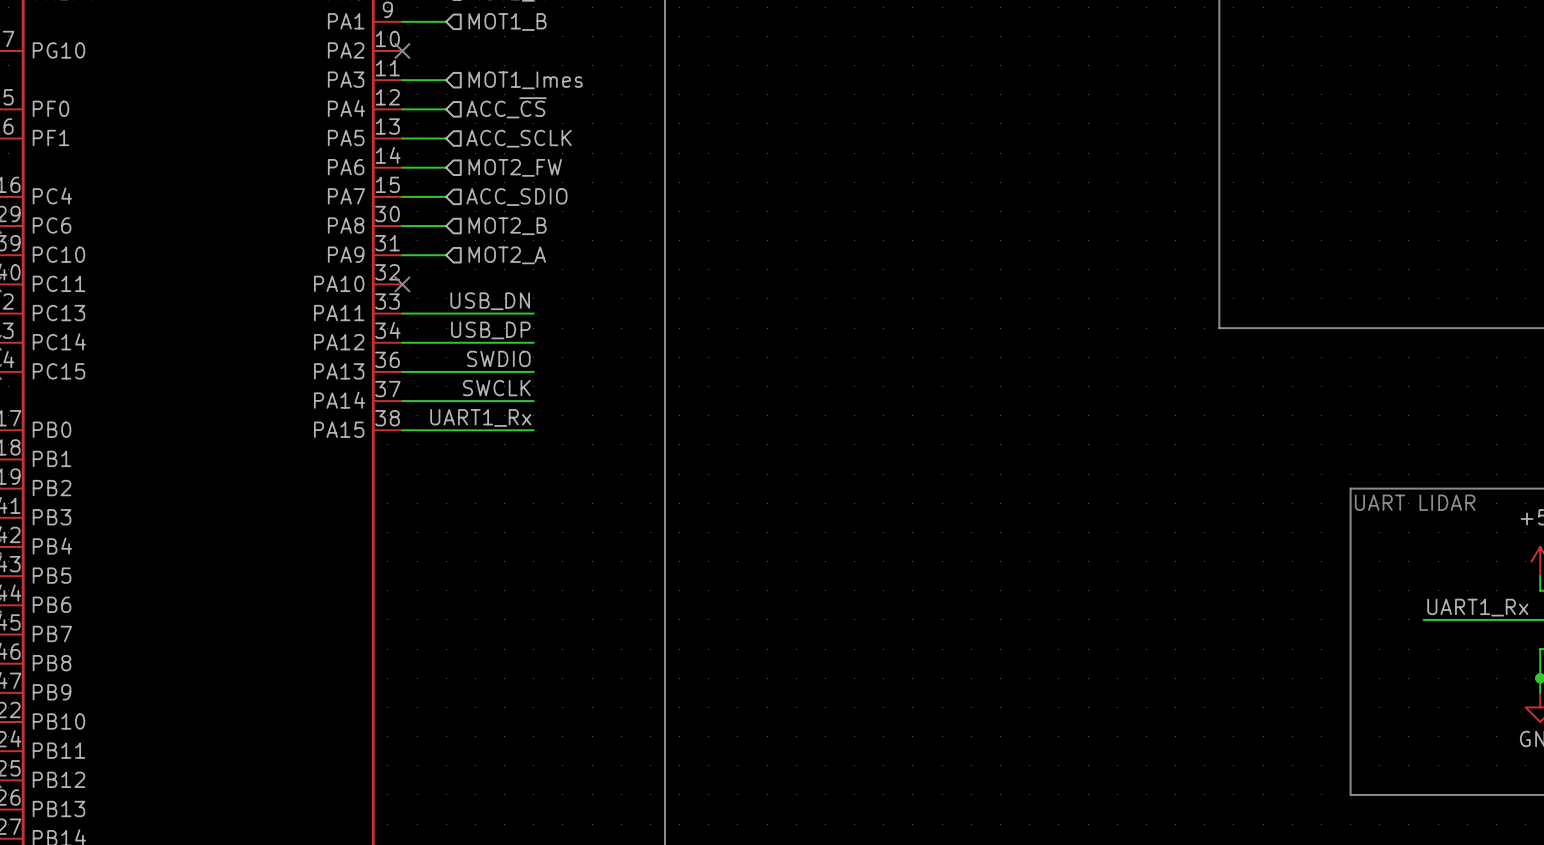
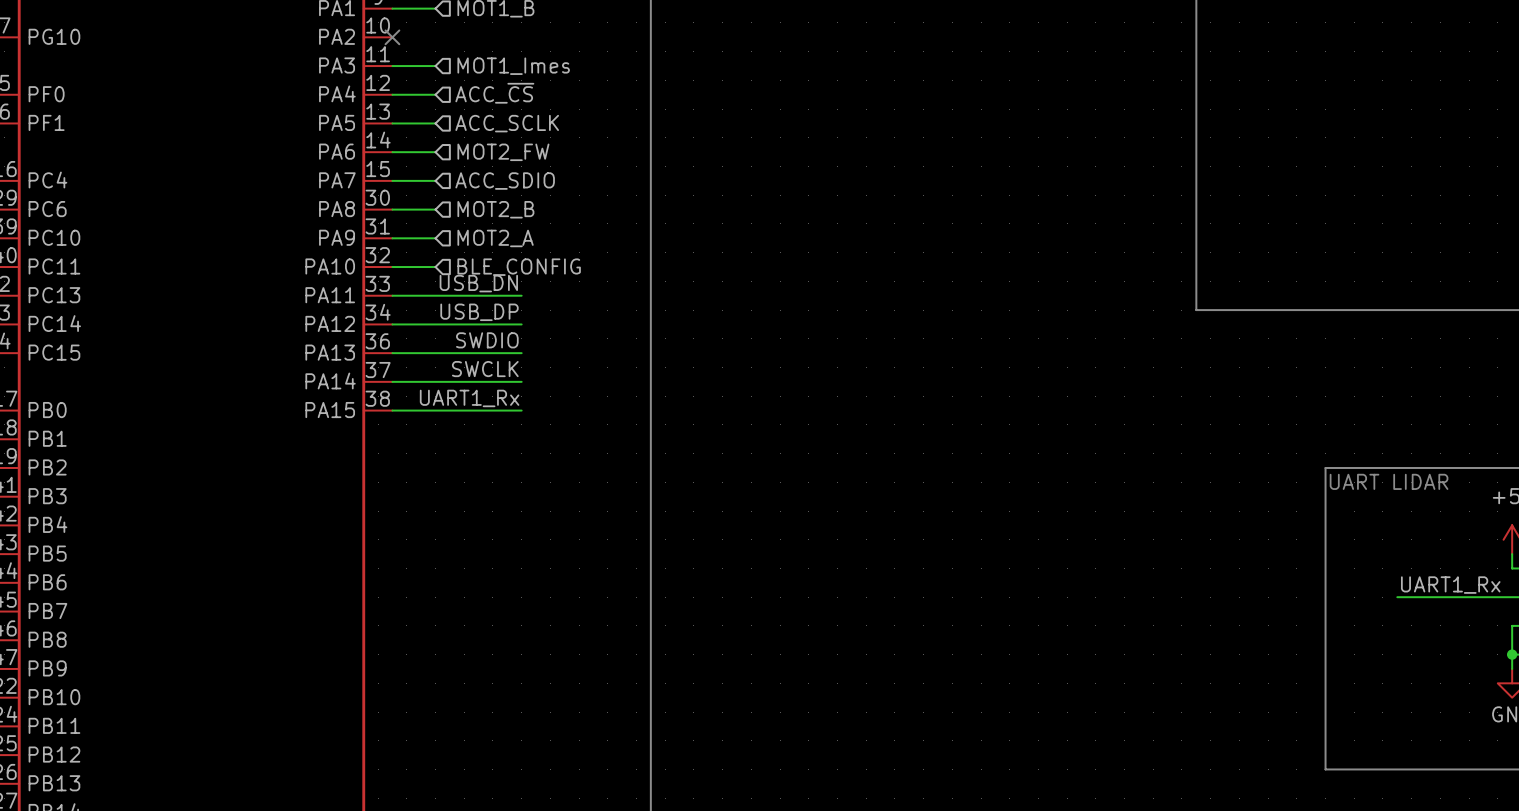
wire: none -> (392, 267) (435, 267)
no-connect mark: (402, 284) -> none
hierarchical label: none -> BLE_CONFIG (519, 267)

